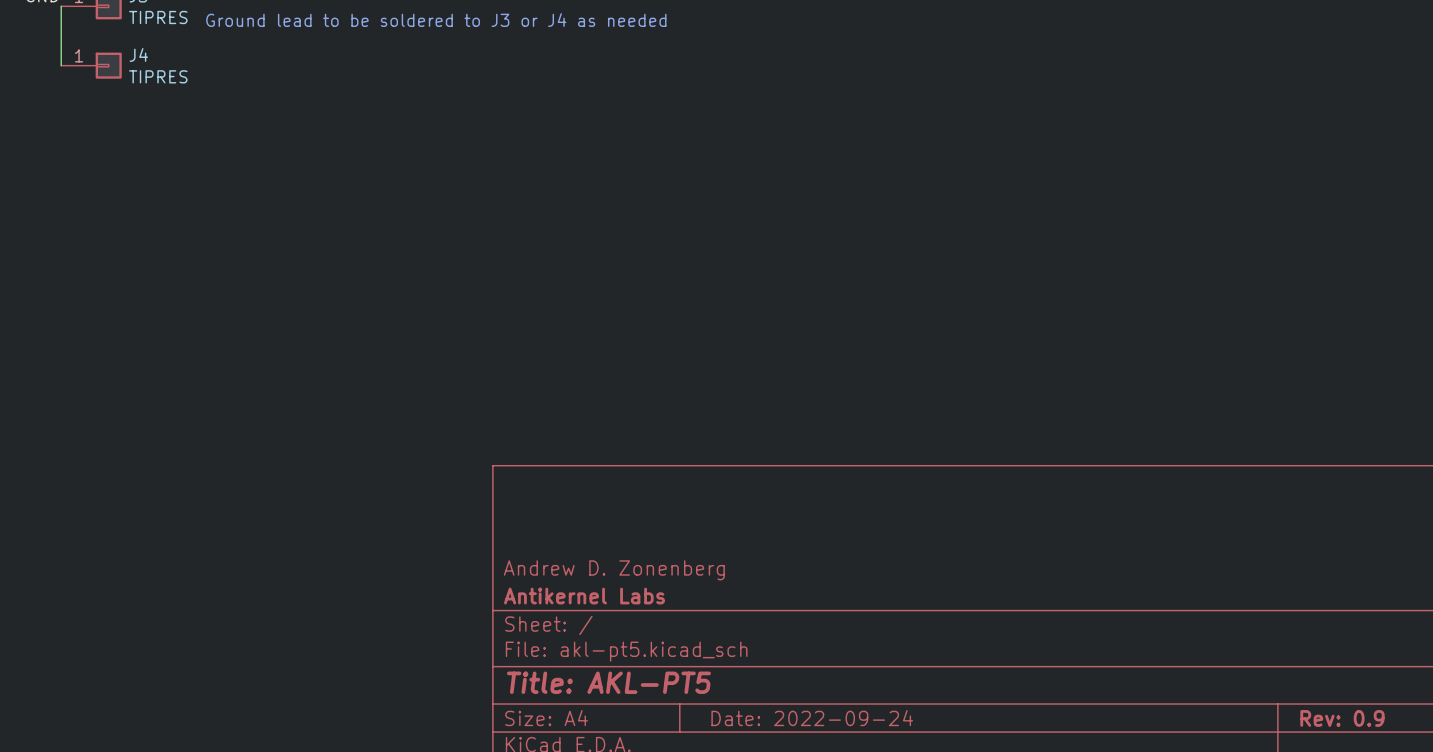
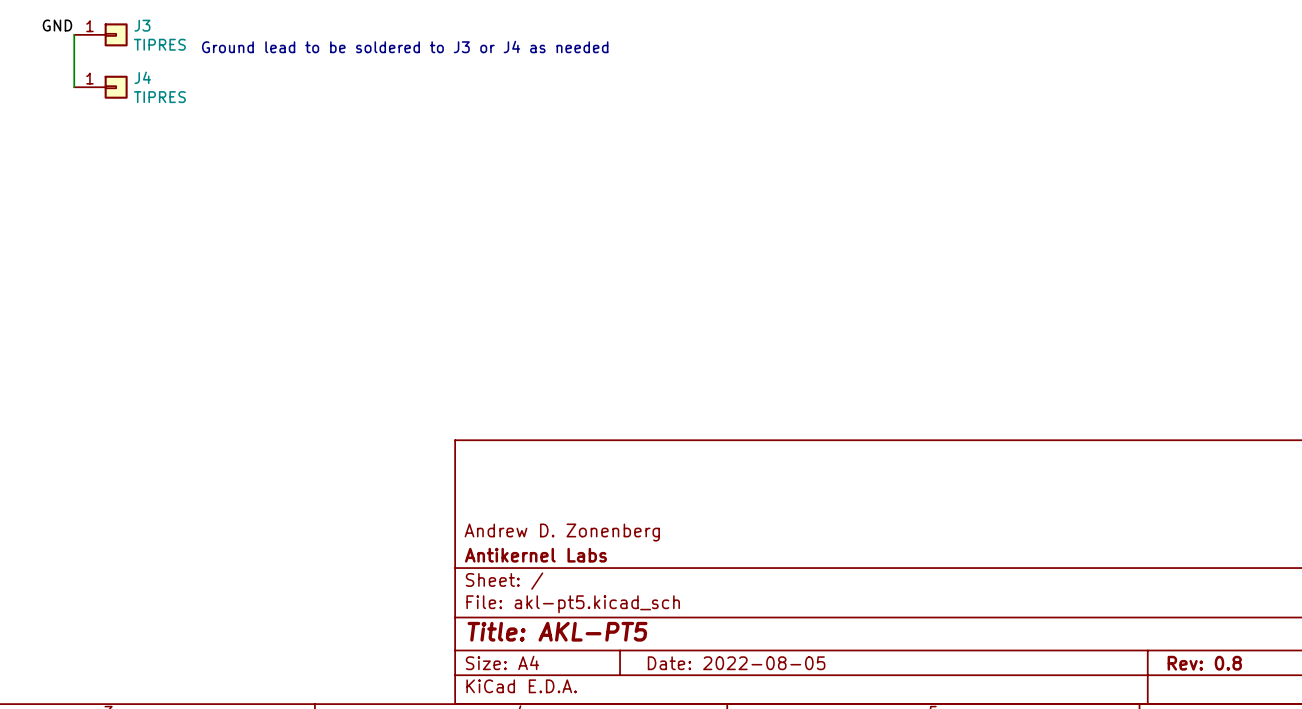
title block: Date: 2022-09-24 (812, 718) -> Date: 2022-08-05 (736, 663)
title block: Rev: 0.9 (1342, 718) -> Rev: 0.8 (1204, 663)

